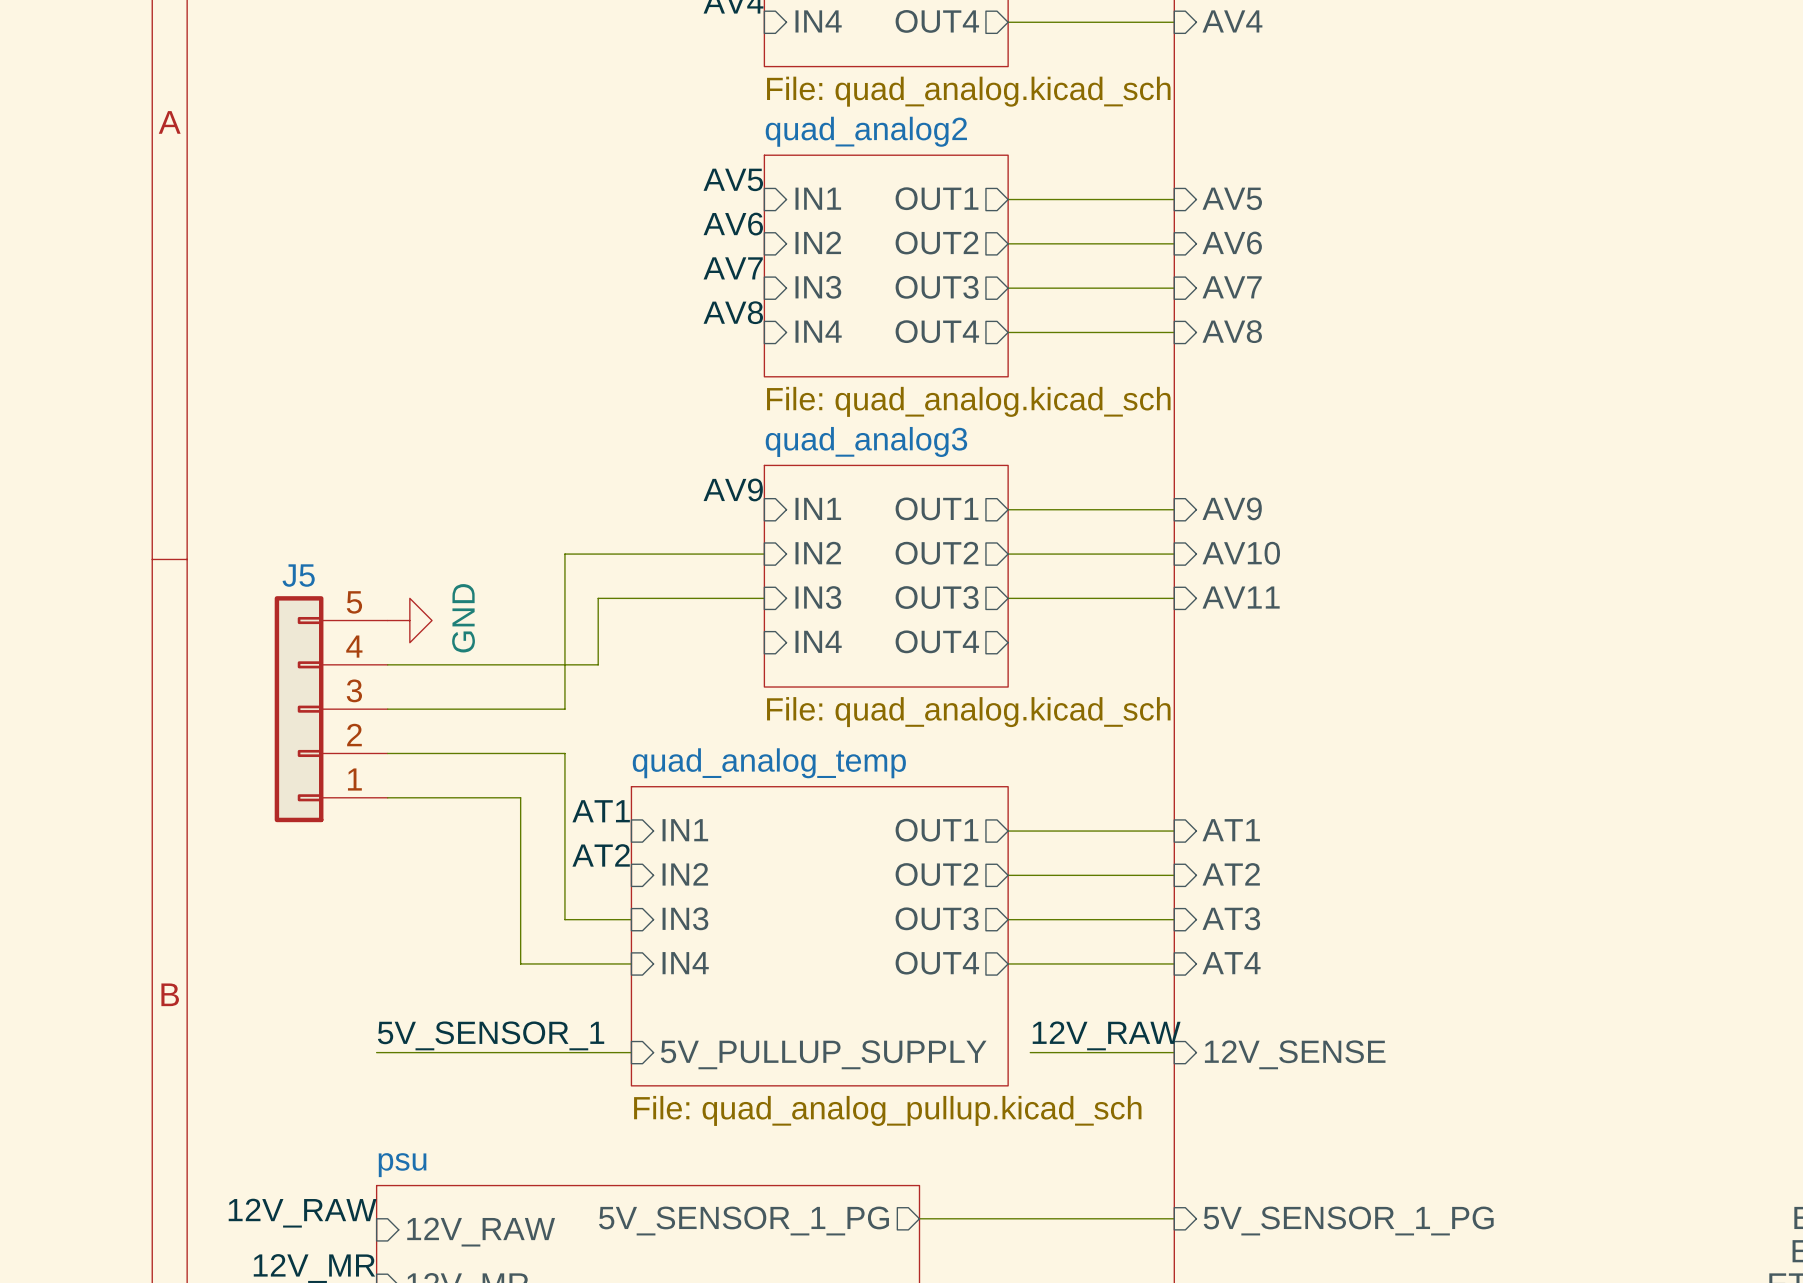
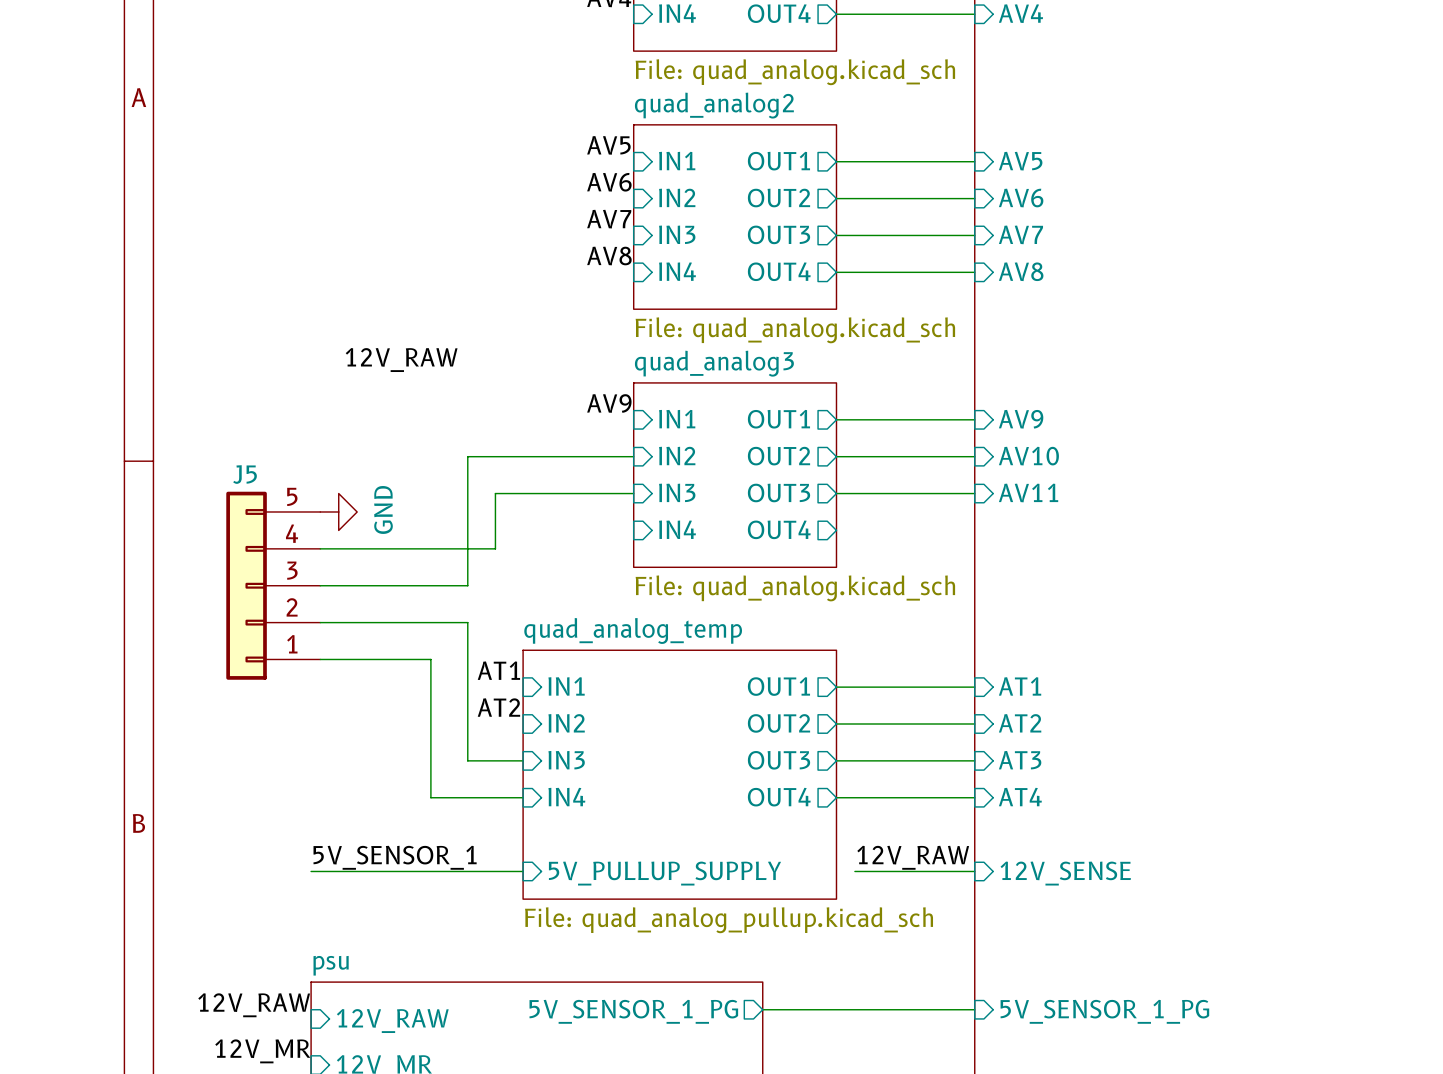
label: none -> 12V_RAW (401, 360)

